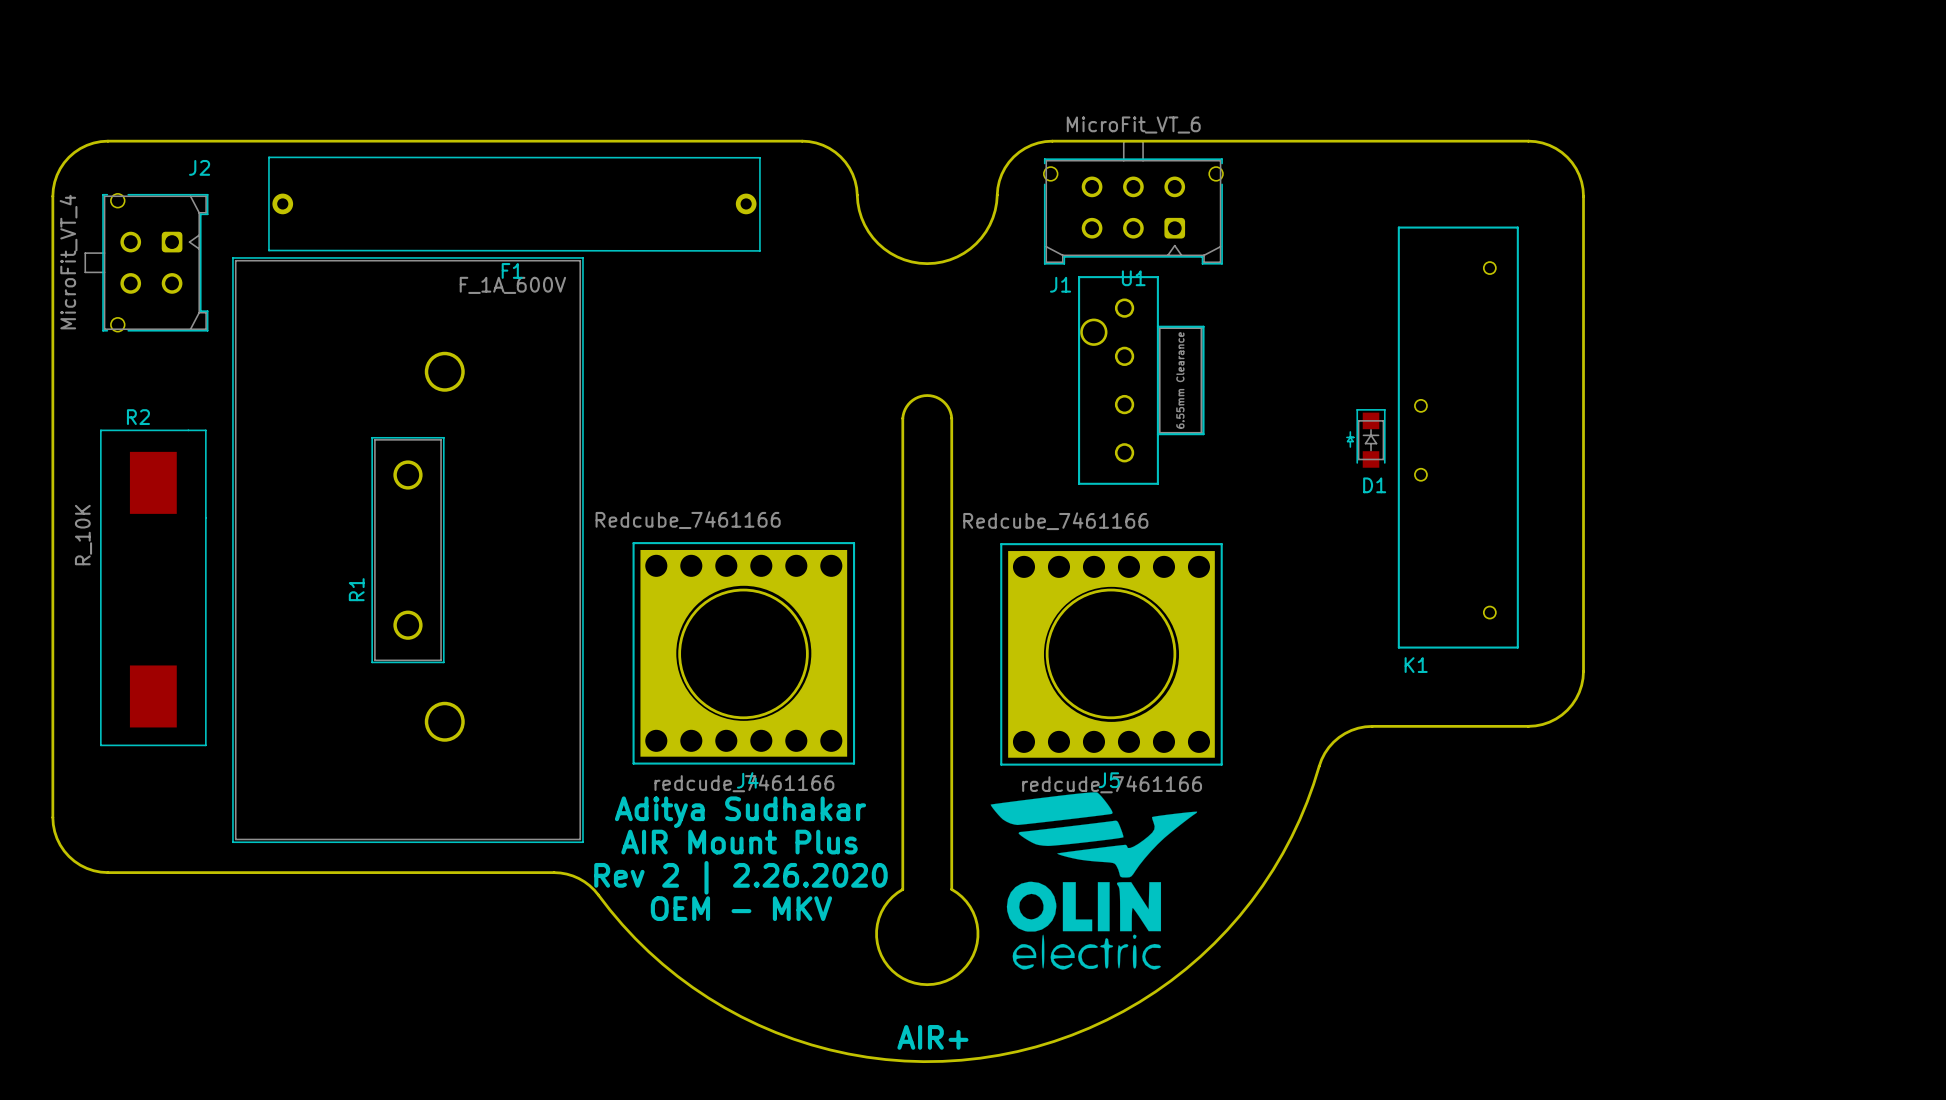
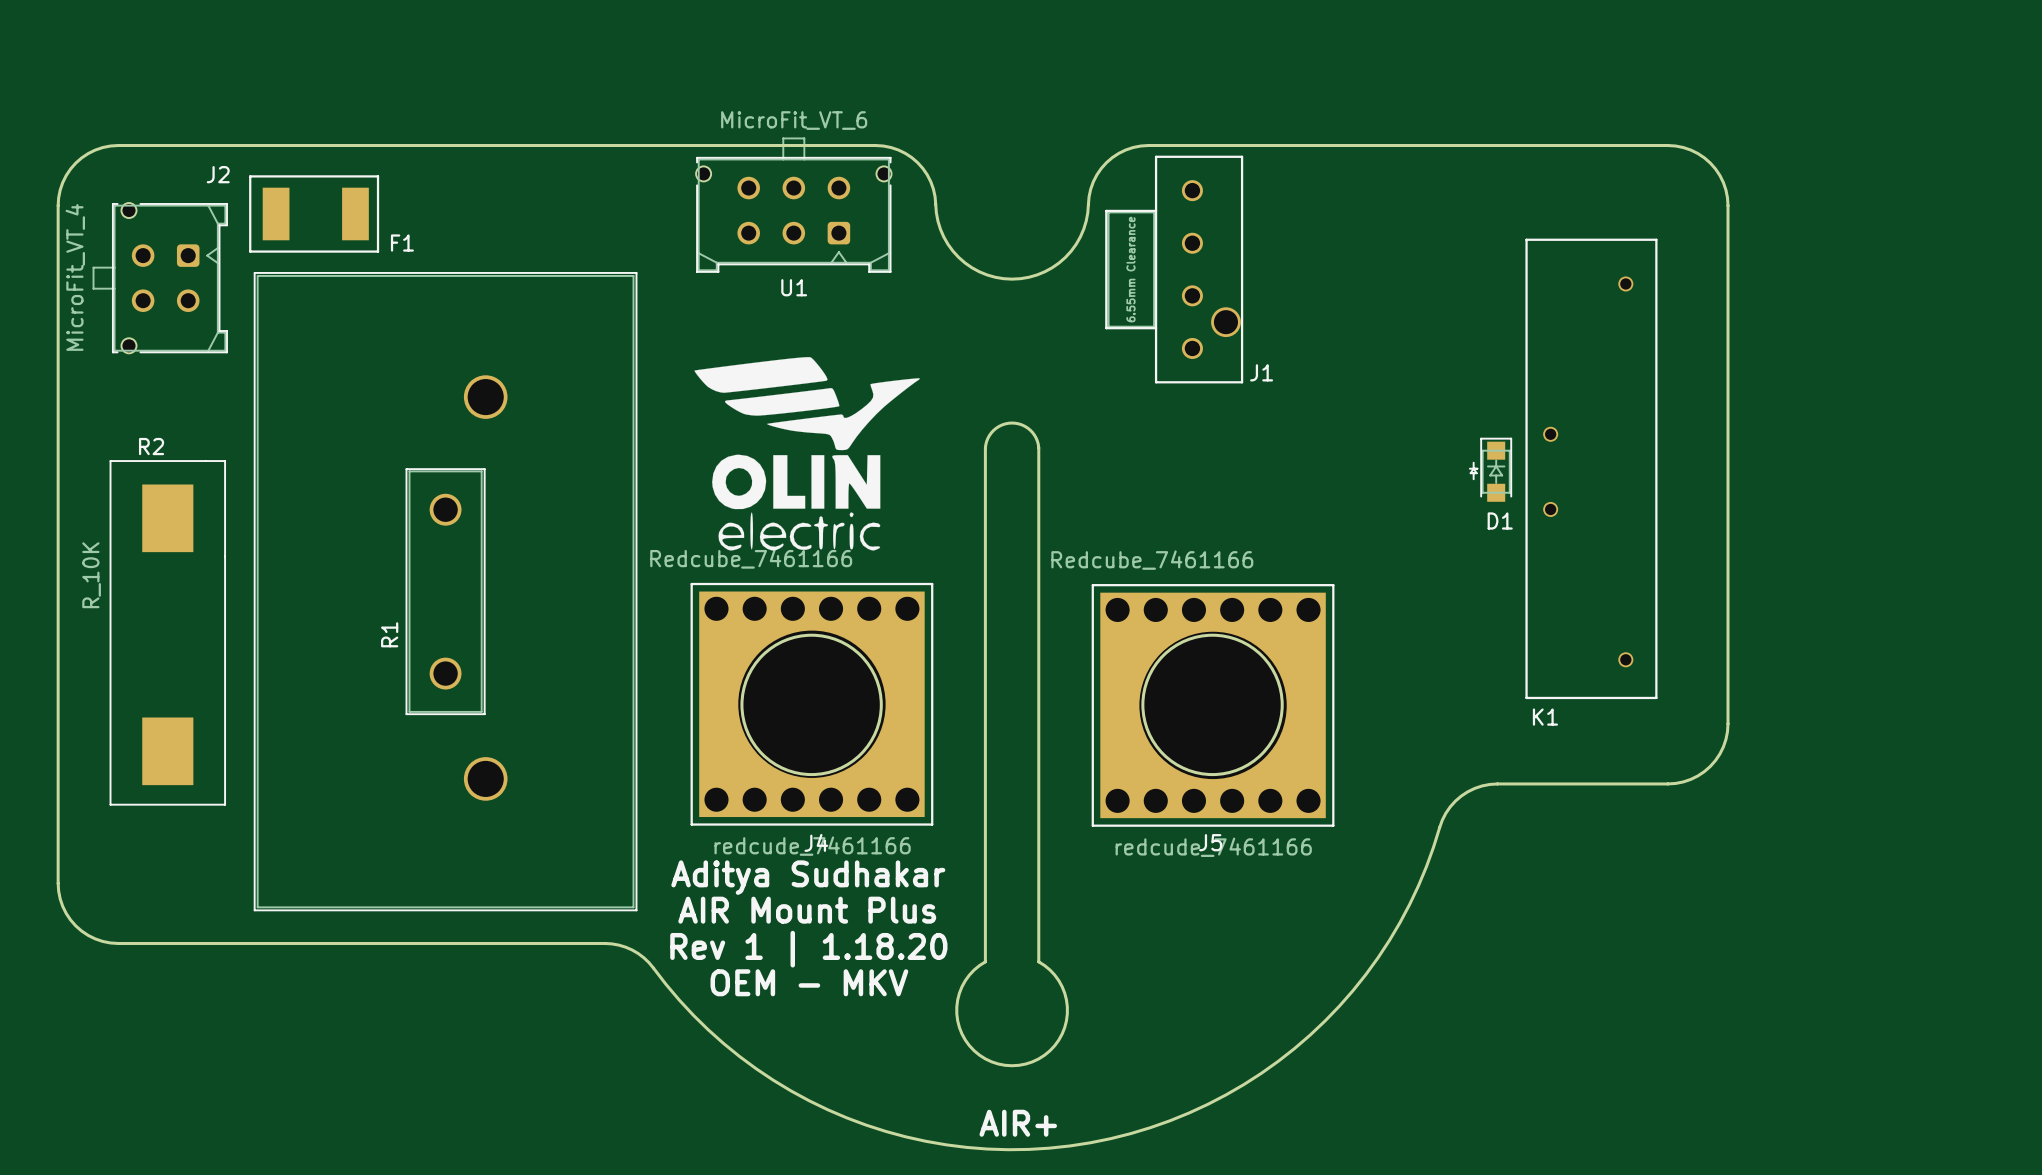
F1 footprint: [268, 156, 761, 252] -> [249, 175, 380, 253]
U1 position: (1133, 202) -> (793, 205)
F1 name position: F1 (512, 270) -> F1 (402, 243)
F1 value: F_1A_600V (512, 285) -> none
drawing: none -> [694, 357, 920, 551]
J1 rotation: 0° (1141, 380) -> 180° (1174, 269)
J1 position: (1141, 380) -> (1174, 269)
drawing: [990, 792, 1198, 970] -> none
text: Rev 2 | 2.26.2020 (740, 877) -> Rev 1 | 1.18.20 (808, 949)

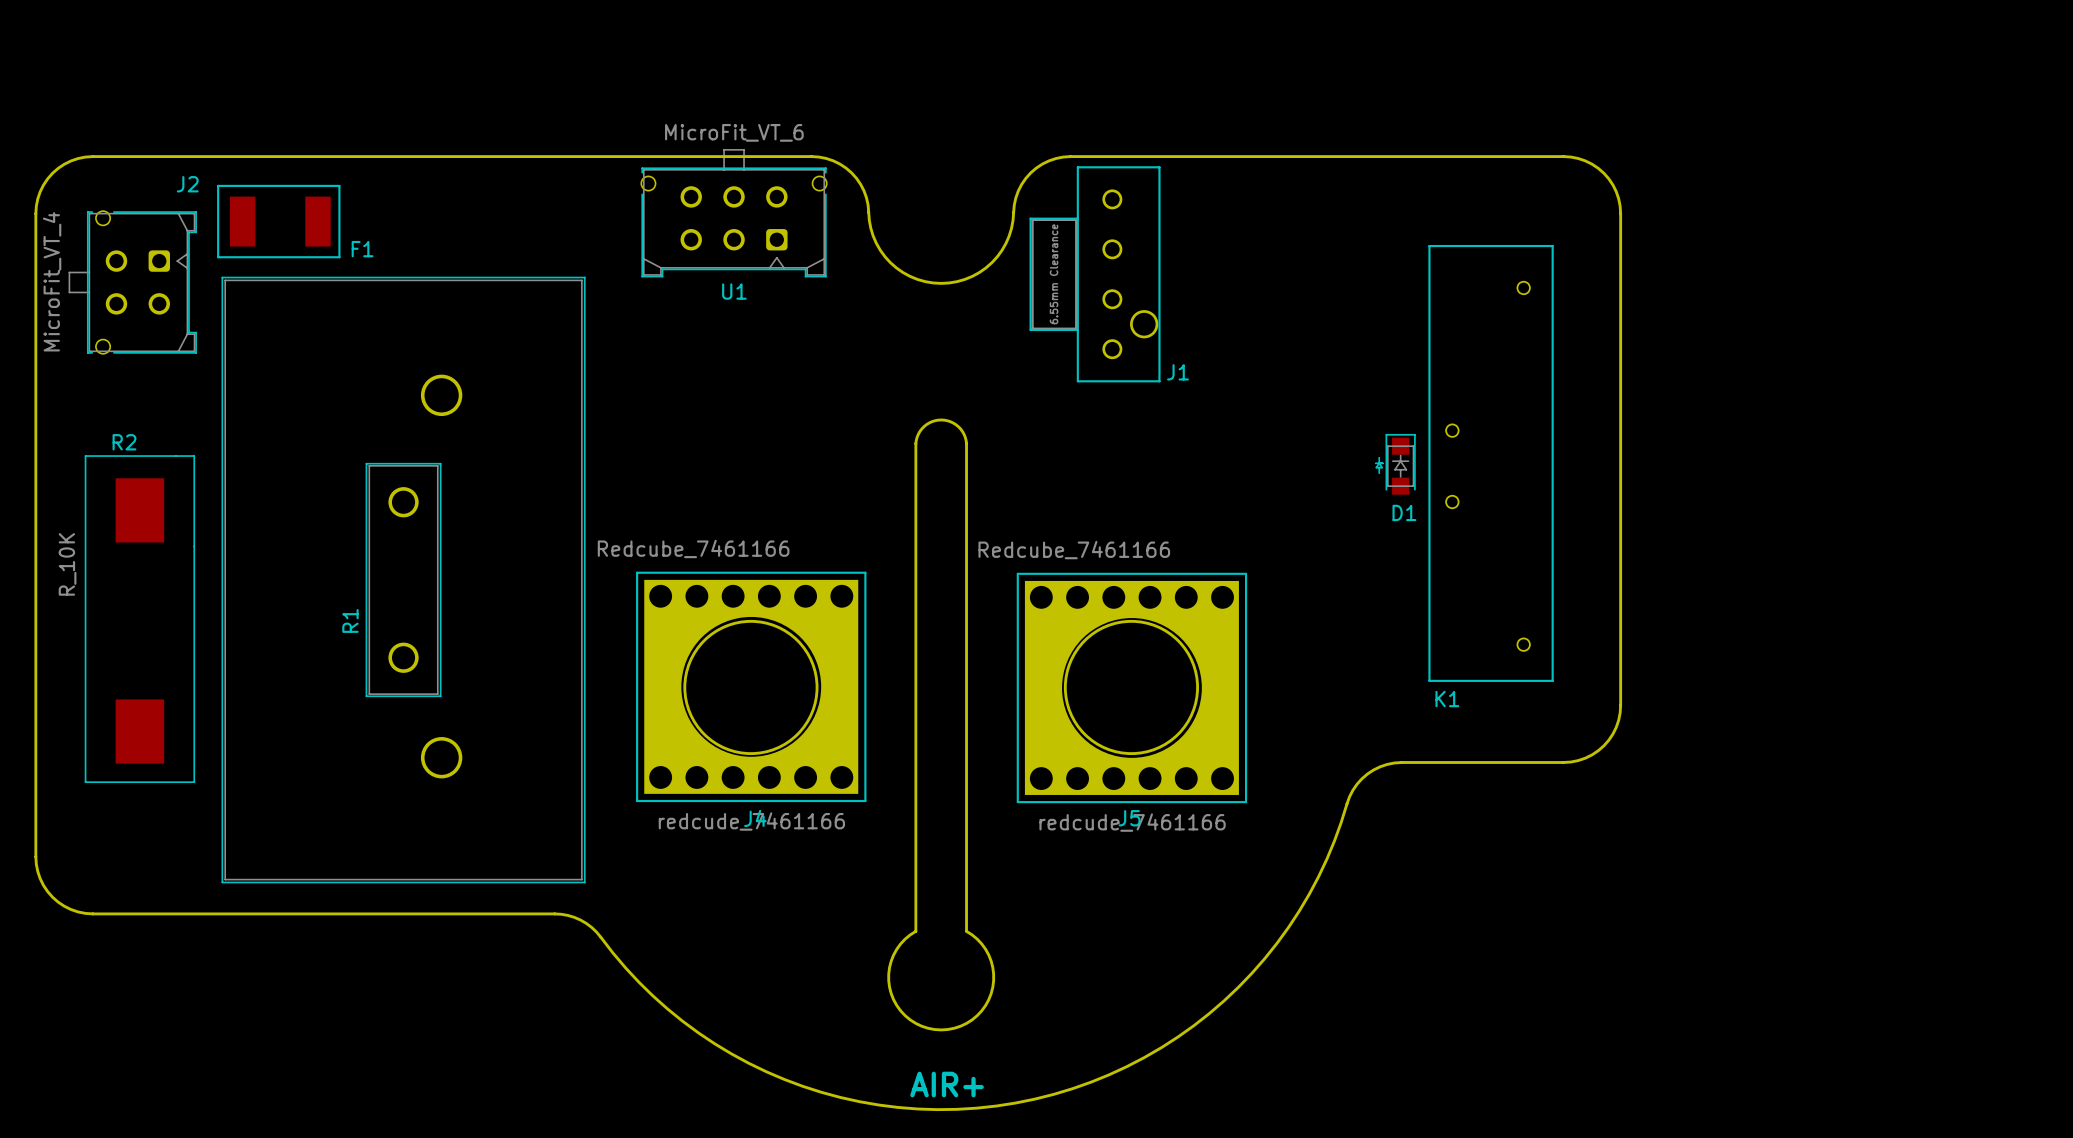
drawing: [694, 357, 920, 551] -> none
text: Aditya Sudhakar (808, 877) -> none
text: AIR Mount Plus (807, 910) -> none
text: Rev 1 | 1.18.20 (808, 949) -> none
text: OEM - MKV (809, 982) -> none

